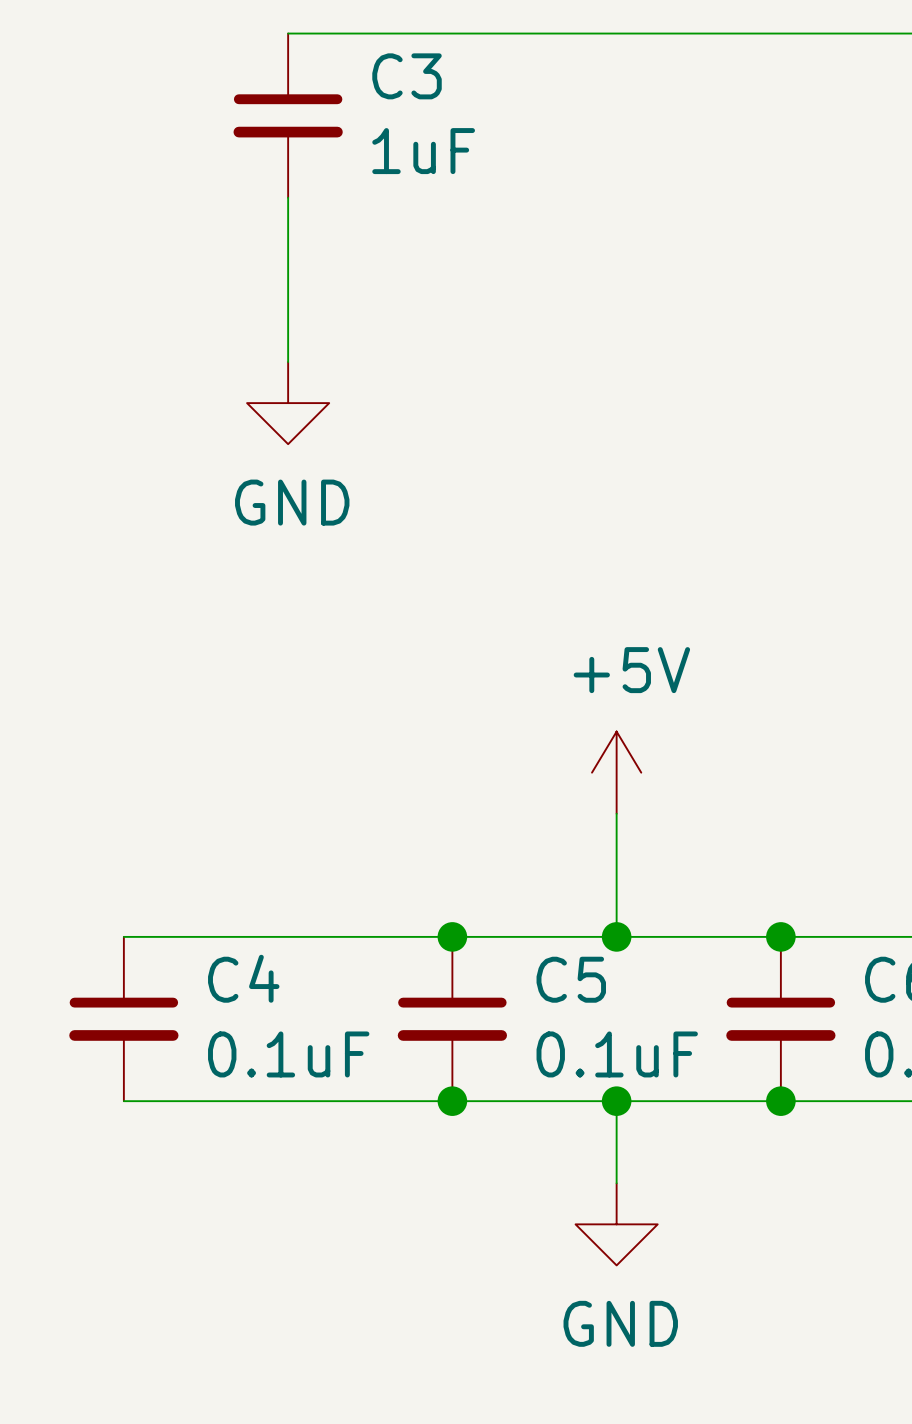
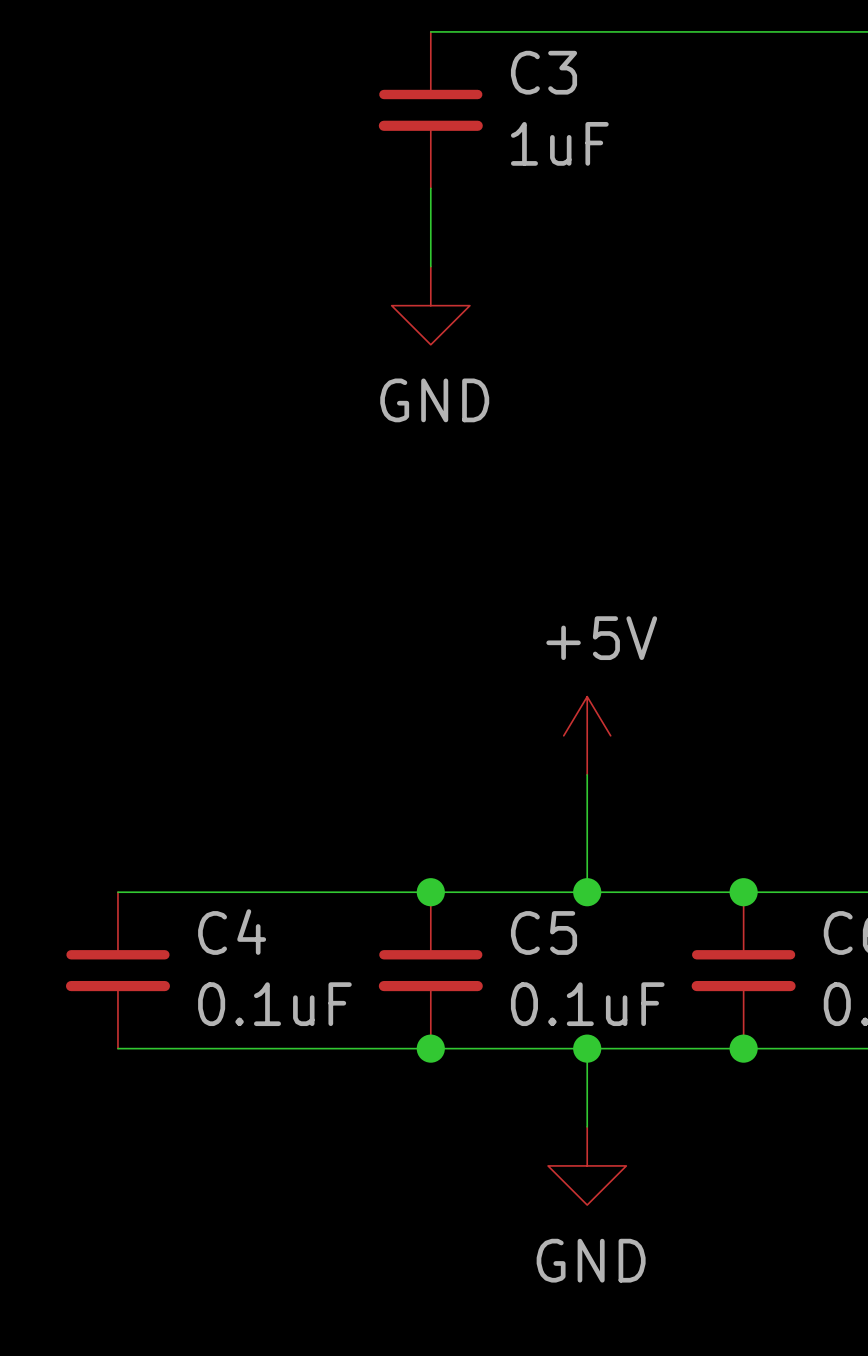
wire: (288, 33) (452, 33) -> none
C3 position: (288, 115) -> (430, 110)
wire: (288, 197) (288, 362) -> none
wire: none -> (430, 188) (430, 266)
power symbol position: GND (288, 403) -> GND (430, 305)

